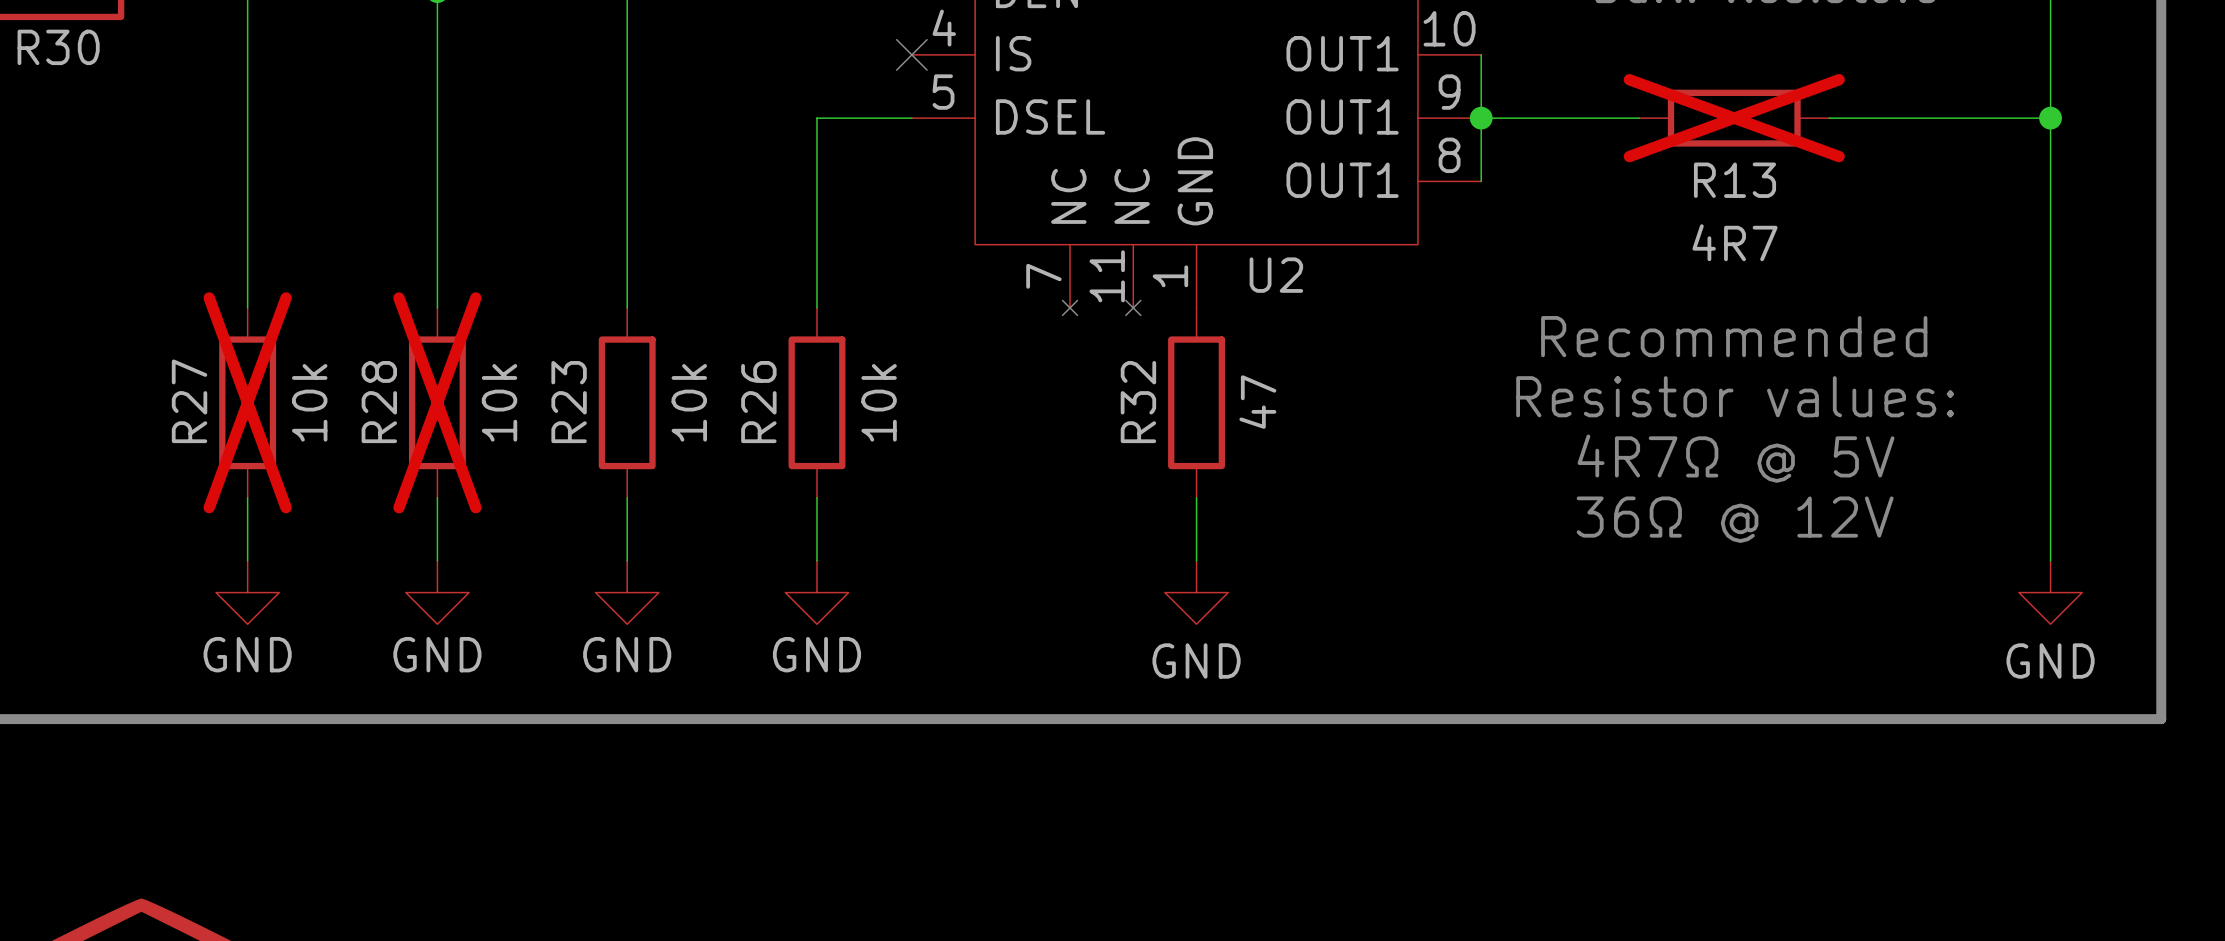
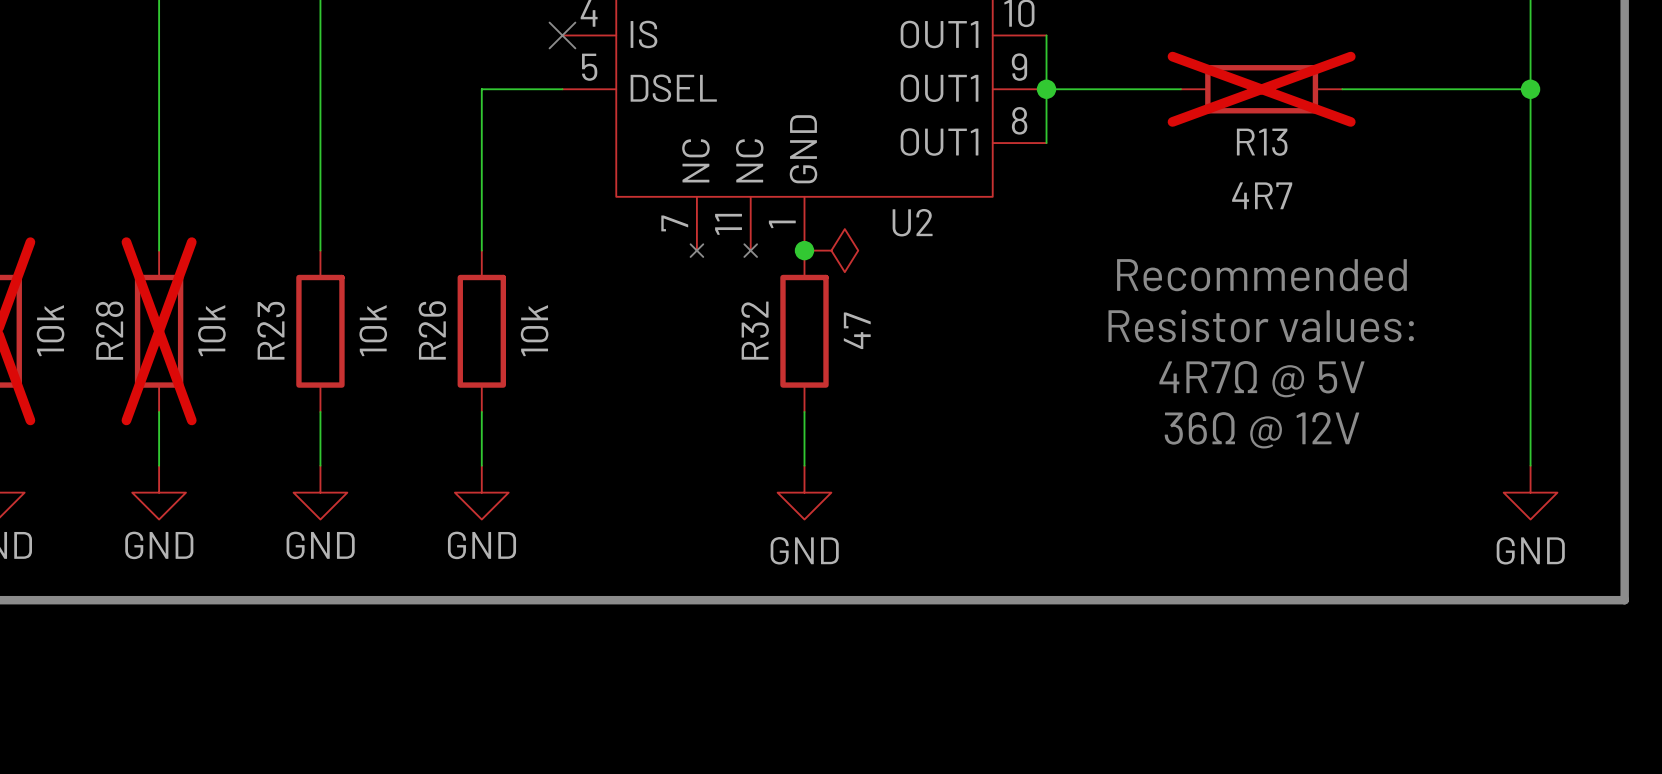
U2 name position: U2 (1276, 275) -> U2 (912, 222)
junction: none -> (804, 250)
power symbol: none -> (831, 250)

